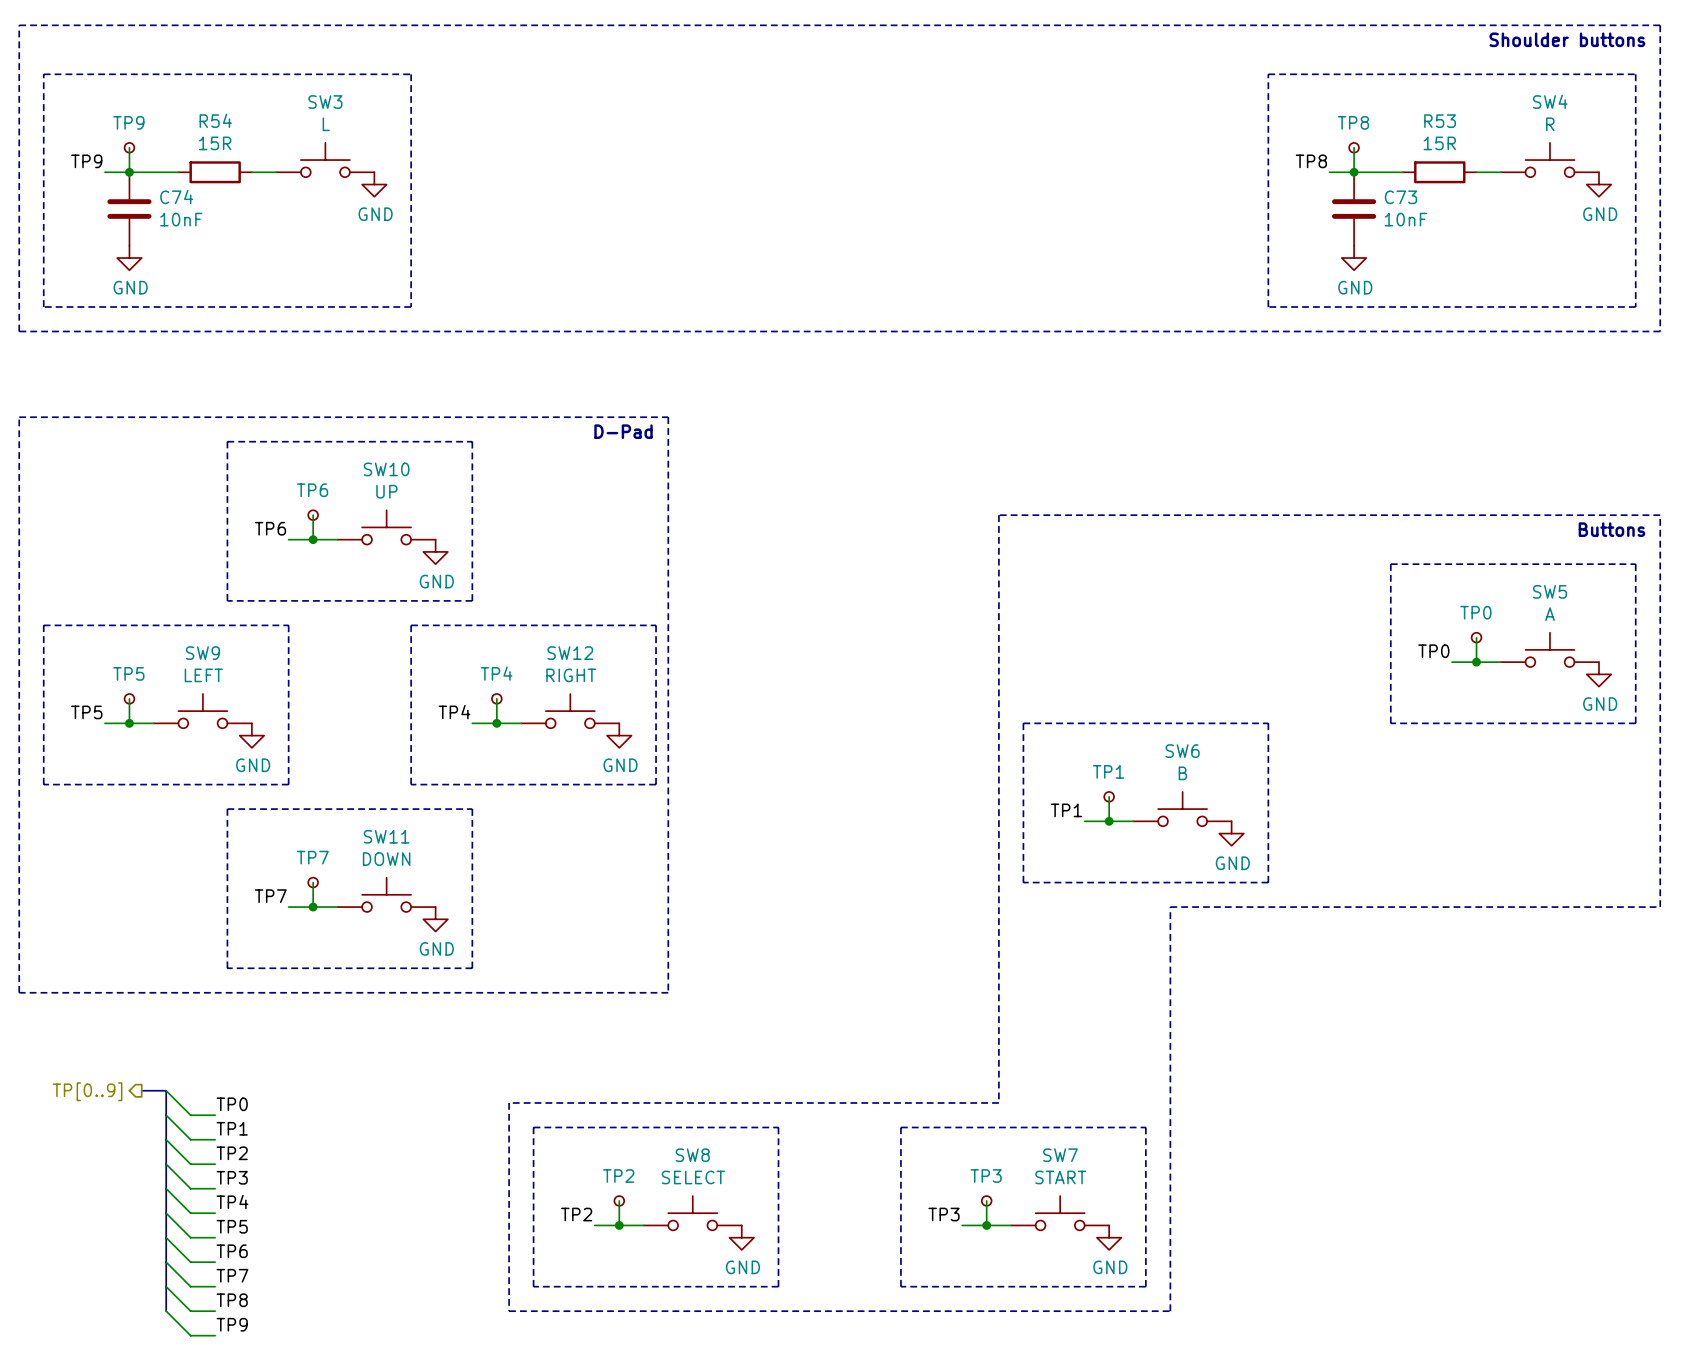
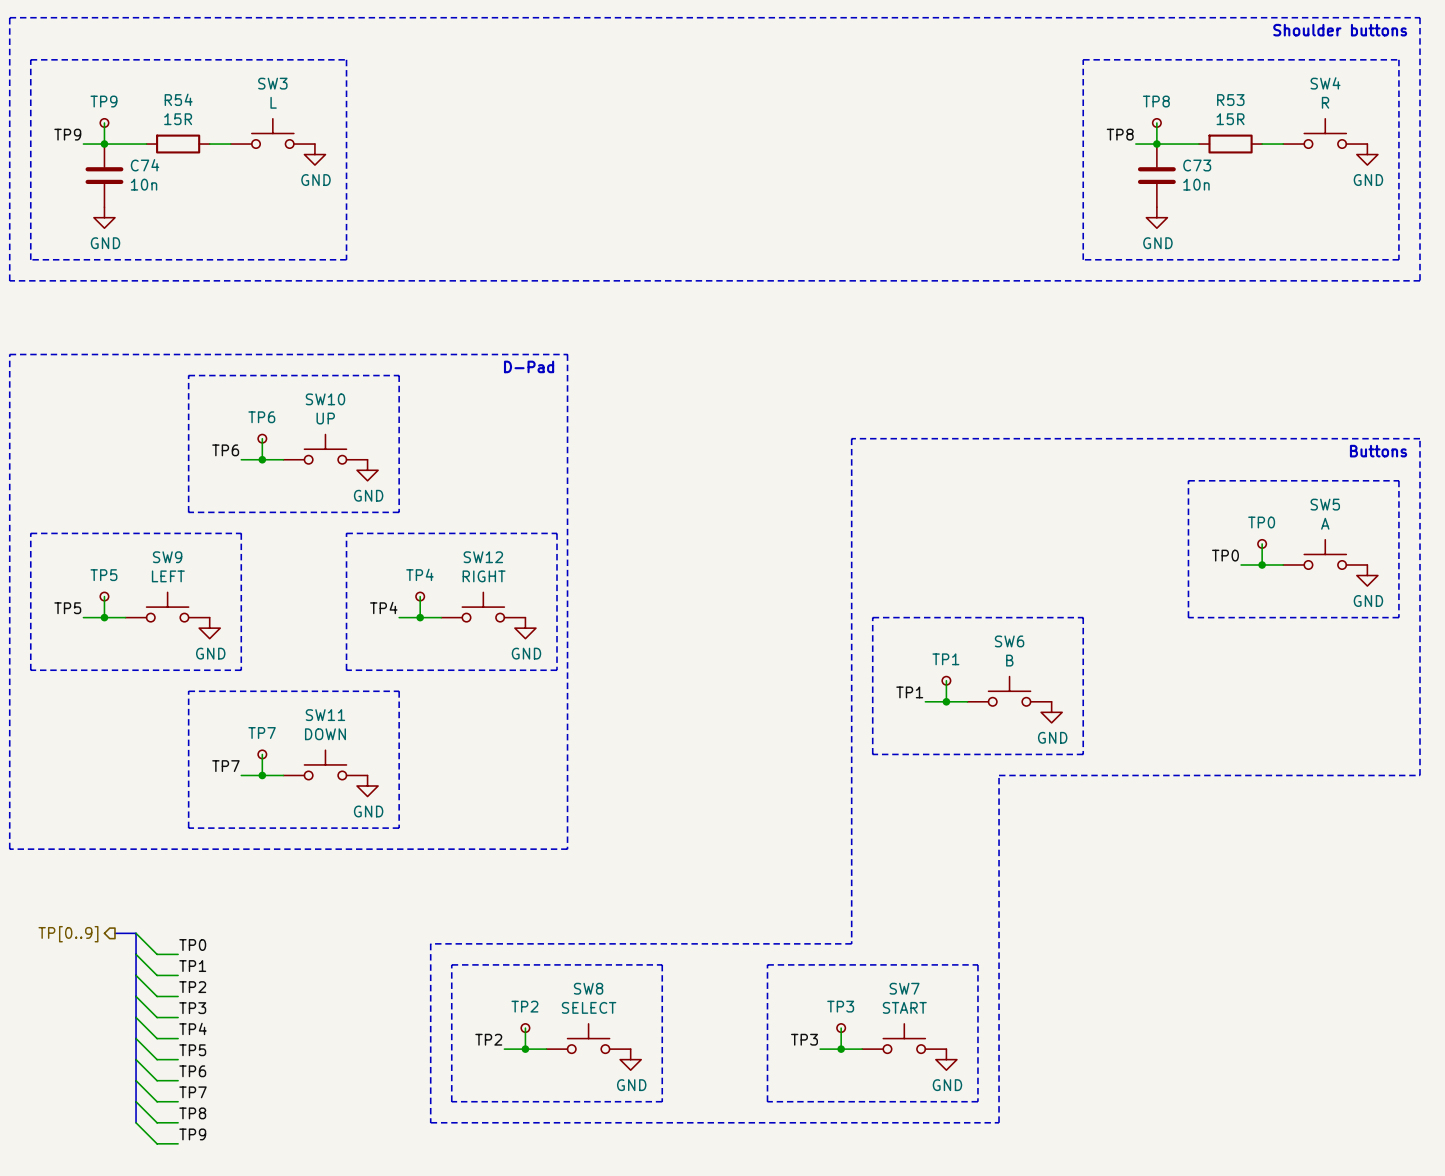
C74 value: 10nF (181, 219) -> 10n (144, 184)
C73 value: 10nF (1405, 219) -> 10n (1196, 184)

